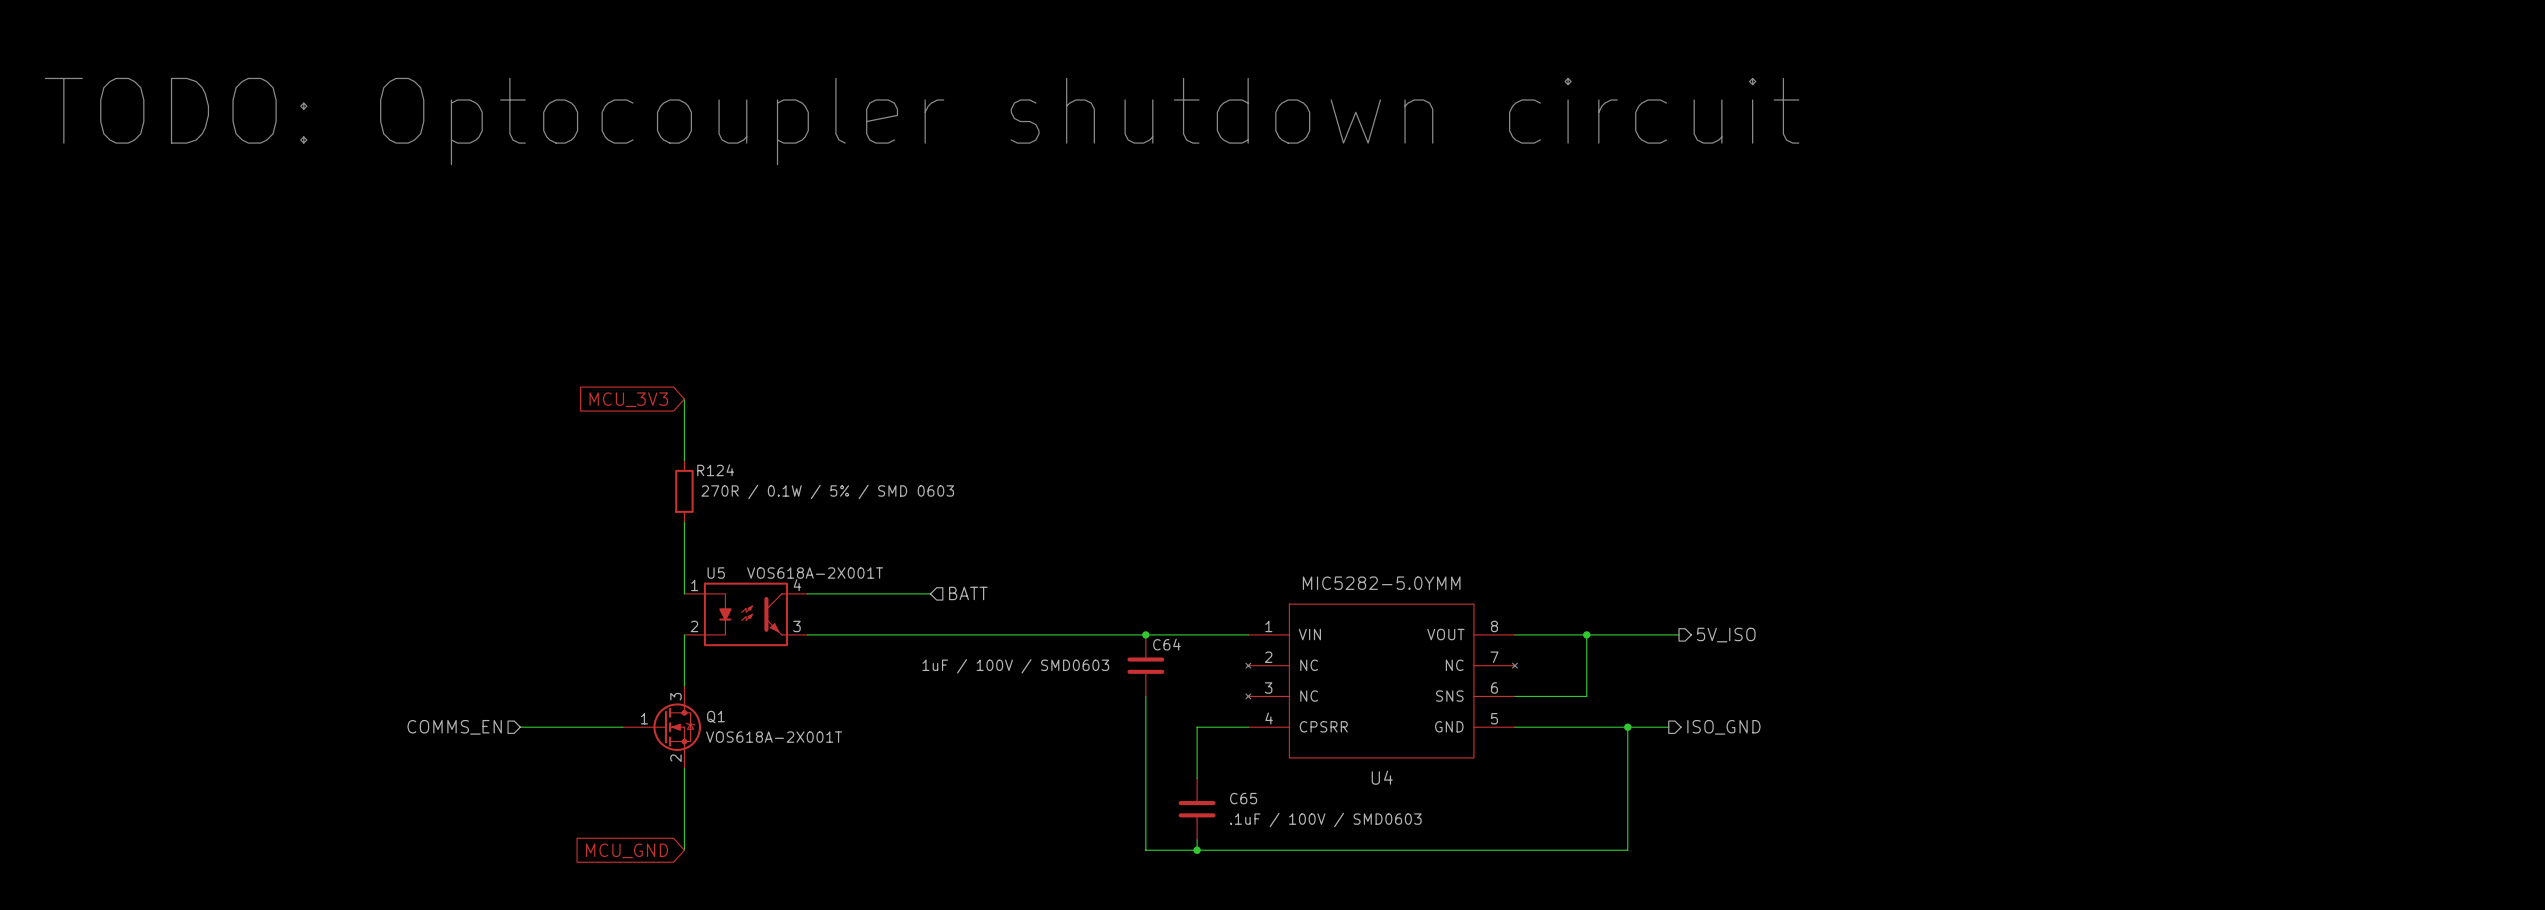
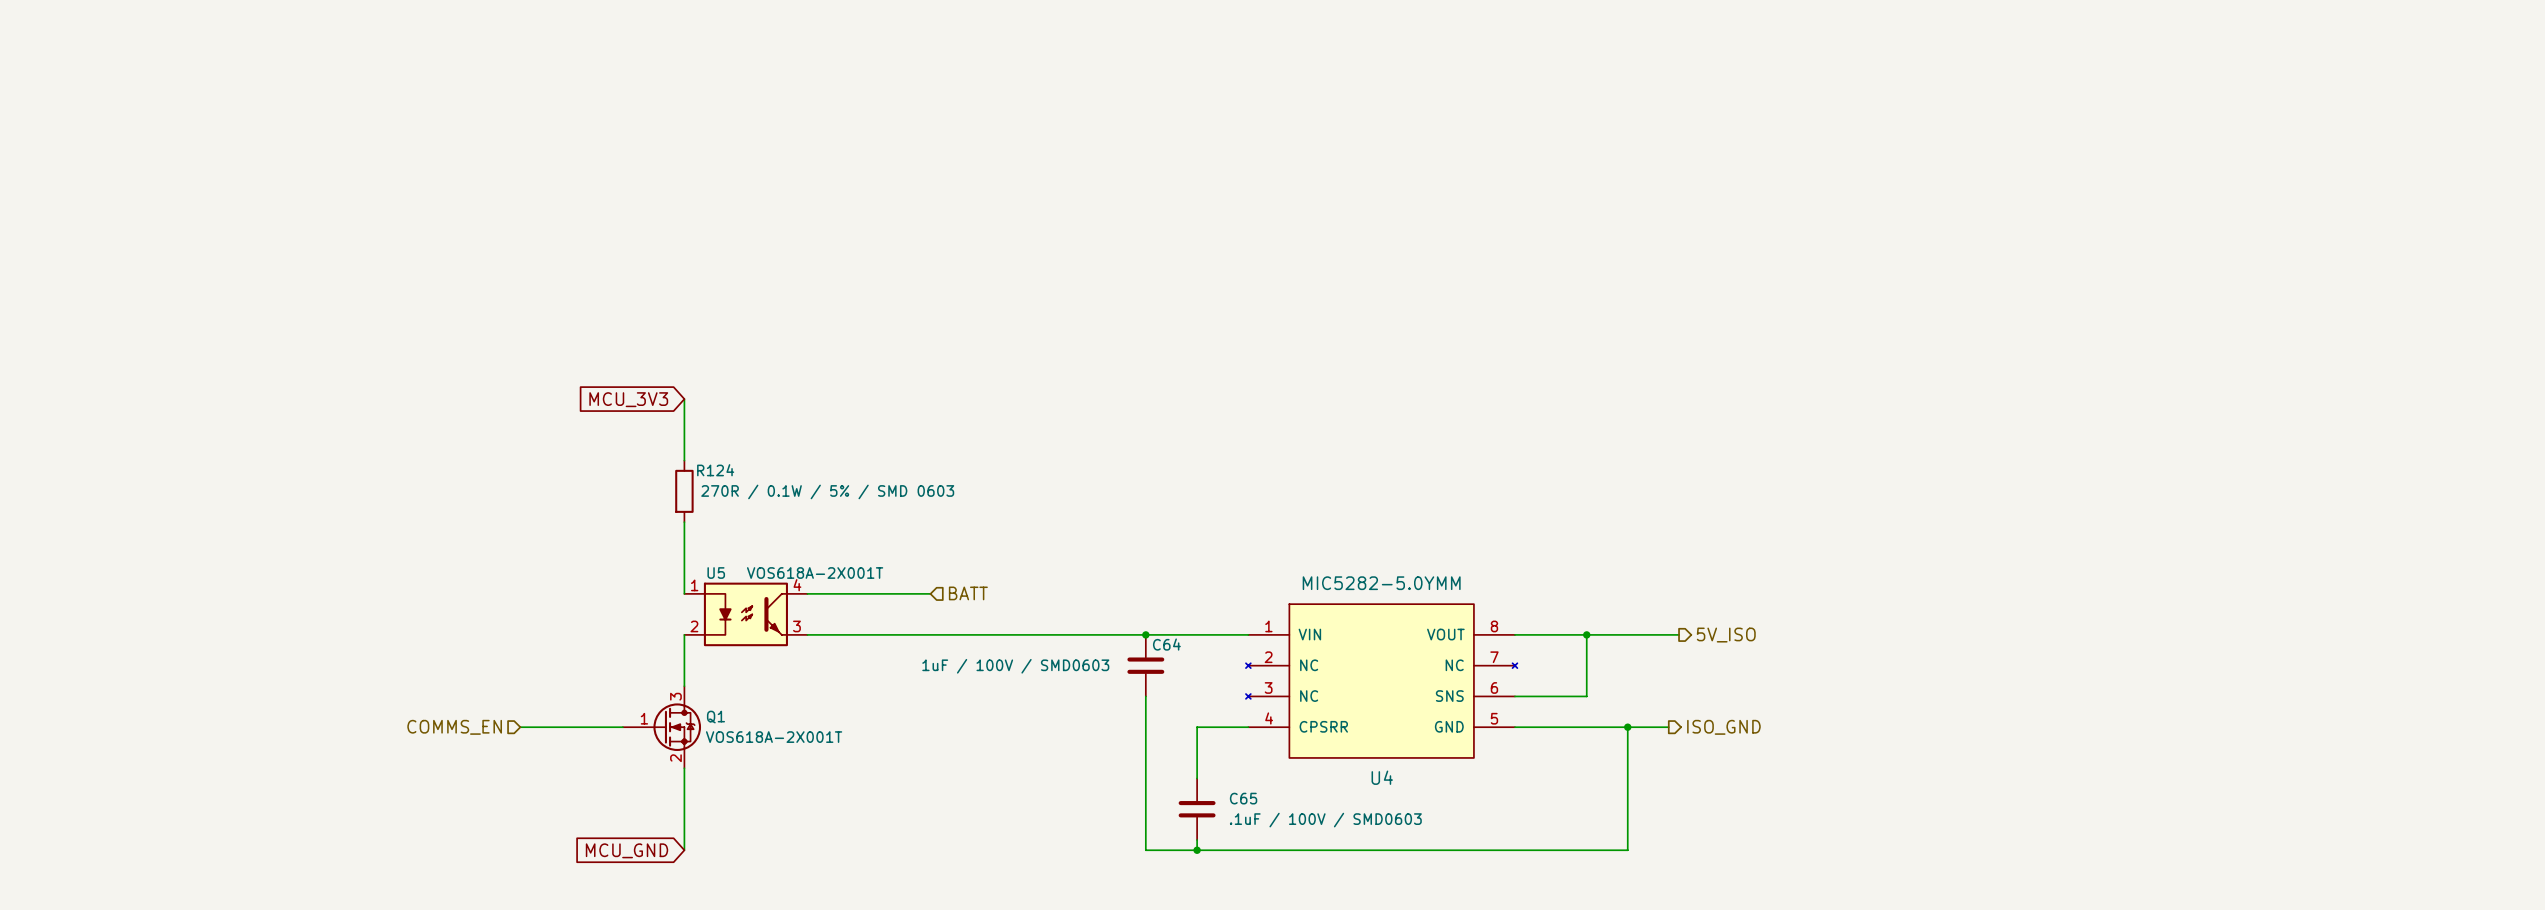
text: TODO: Optocoupler shutdown circuit (922, 121) -> none

